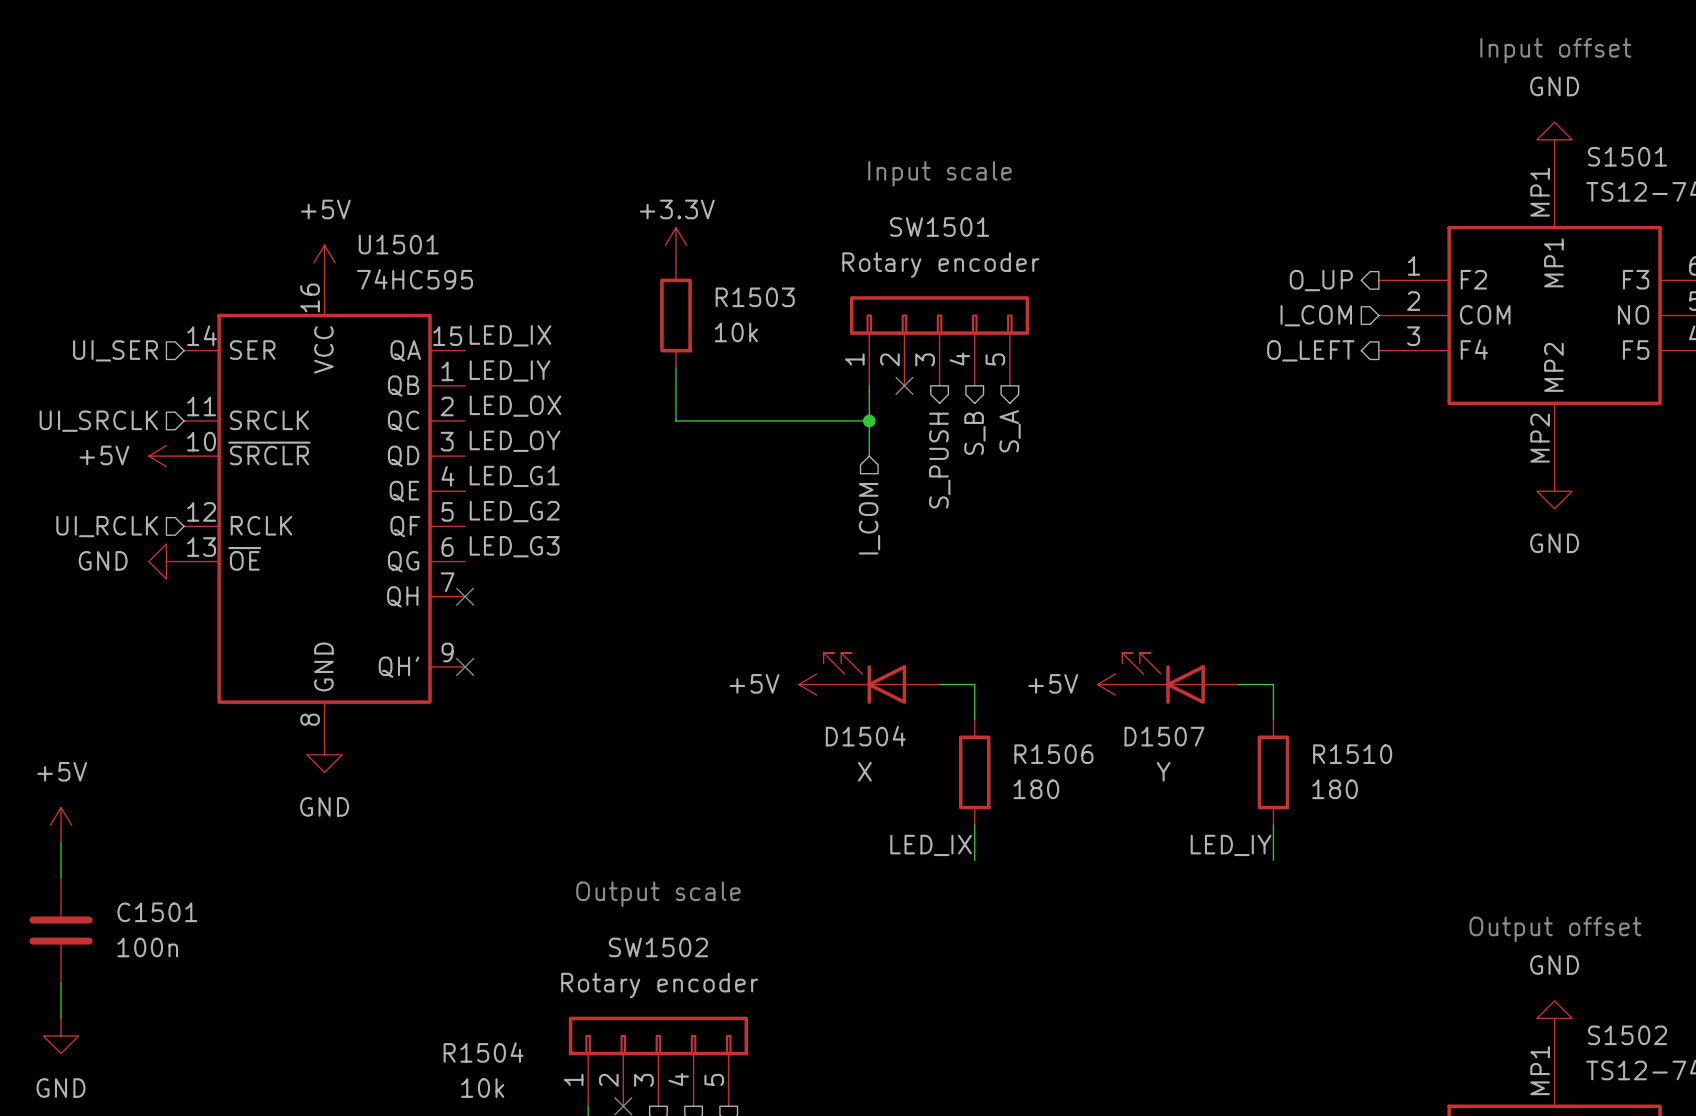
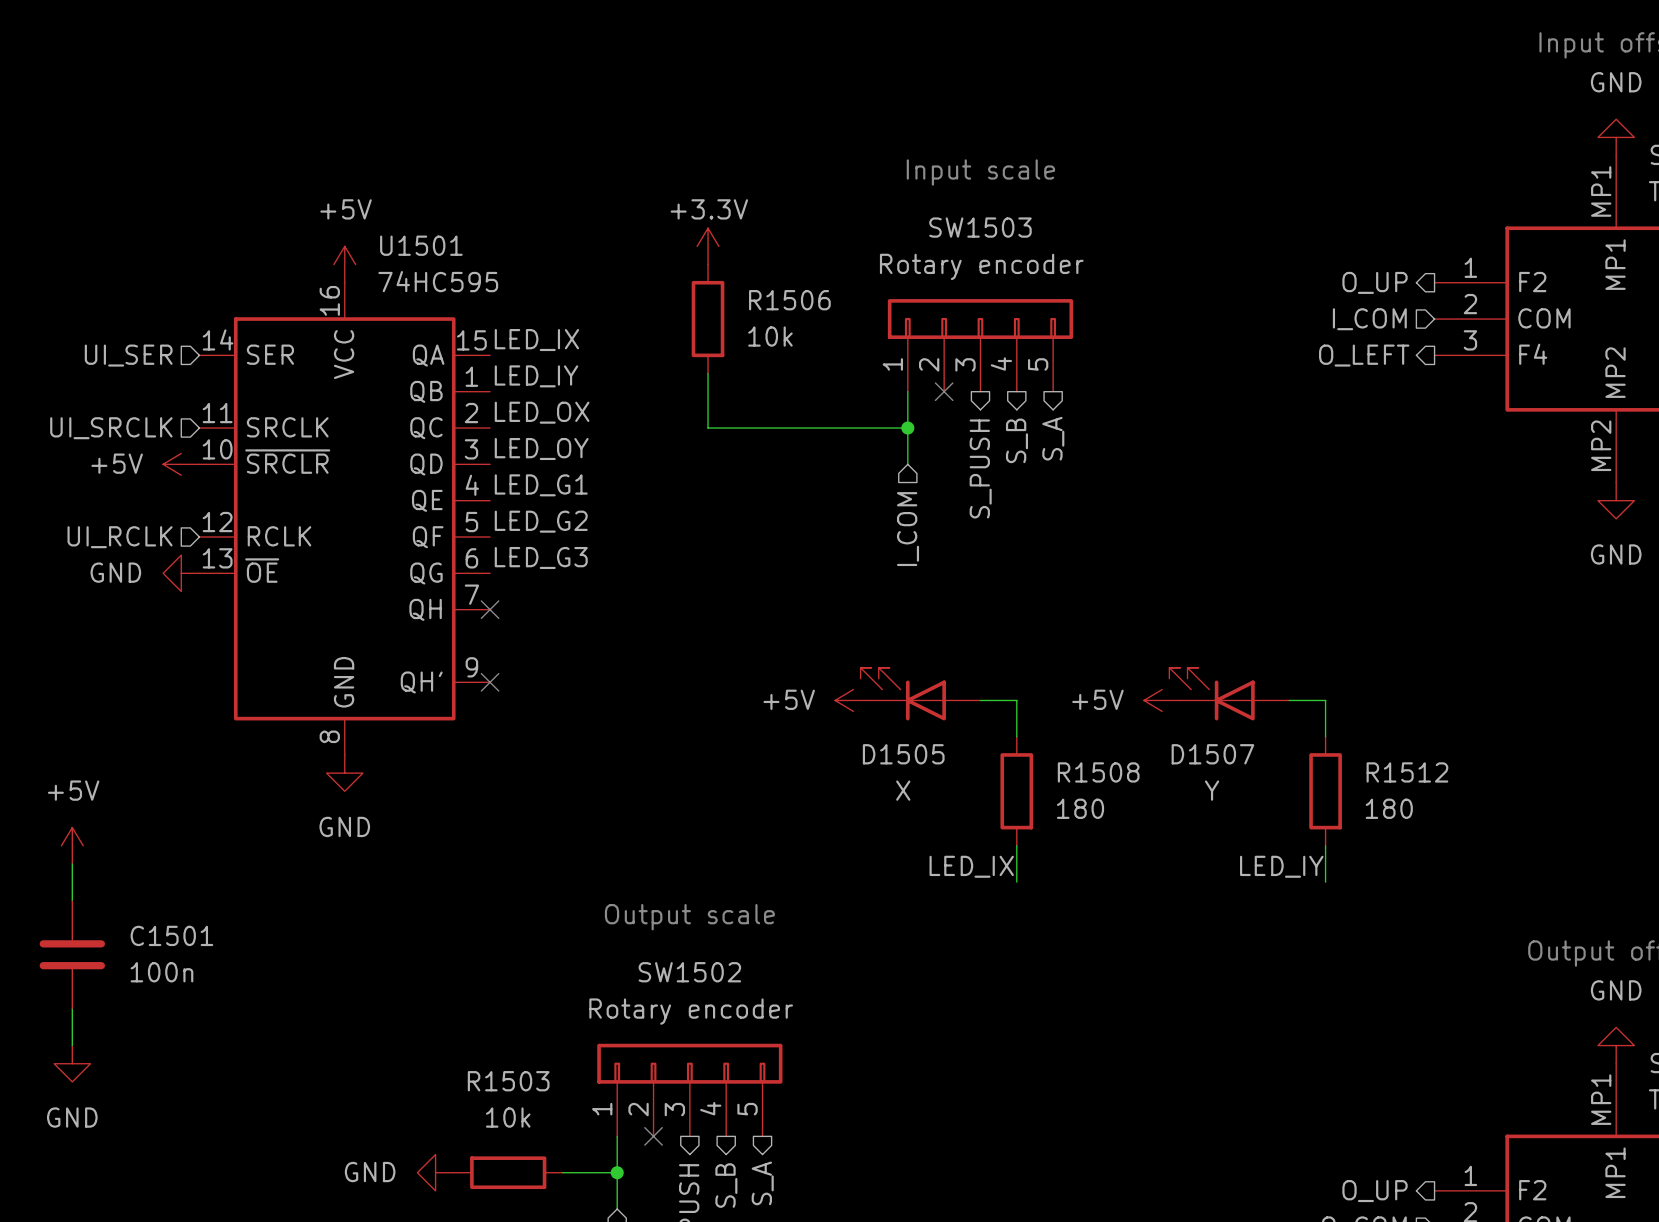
SW1501 name: SW1501 (939, 227) -> SW1503 (980, 227)
R1503 name: R1503 (755, 297) -> R1506 (789, 300)
D1504 name: D1504 (865, 736) -> D1505 (903, 754)
R1506 name: R1506 (1053, 754) -> R1508 (1098, 772)
R1510 name: R1510 (1352, 754) -> R1512 (1407, 772)
R1504 name: R1504 (483, 1052) -> R1503 (508, 1081)

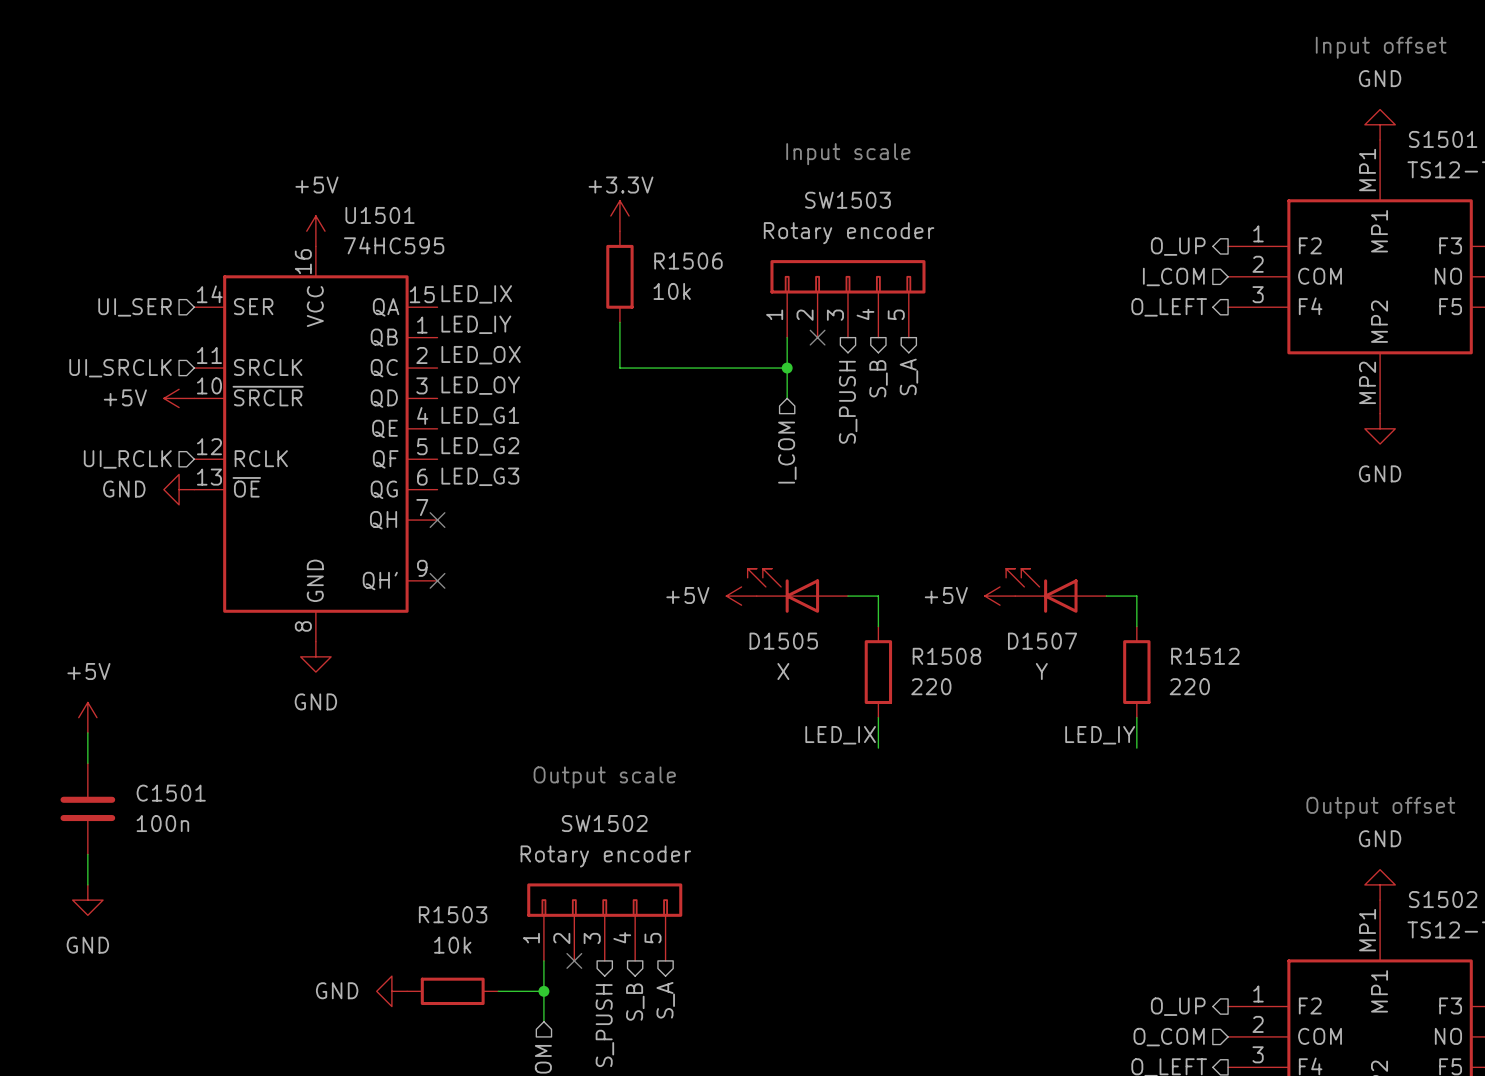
R1508 value: 180 (1080, 808) -> 220 (931, 686)
R1512 value: 180 (1389, 808) -> 220 (1189, 686)

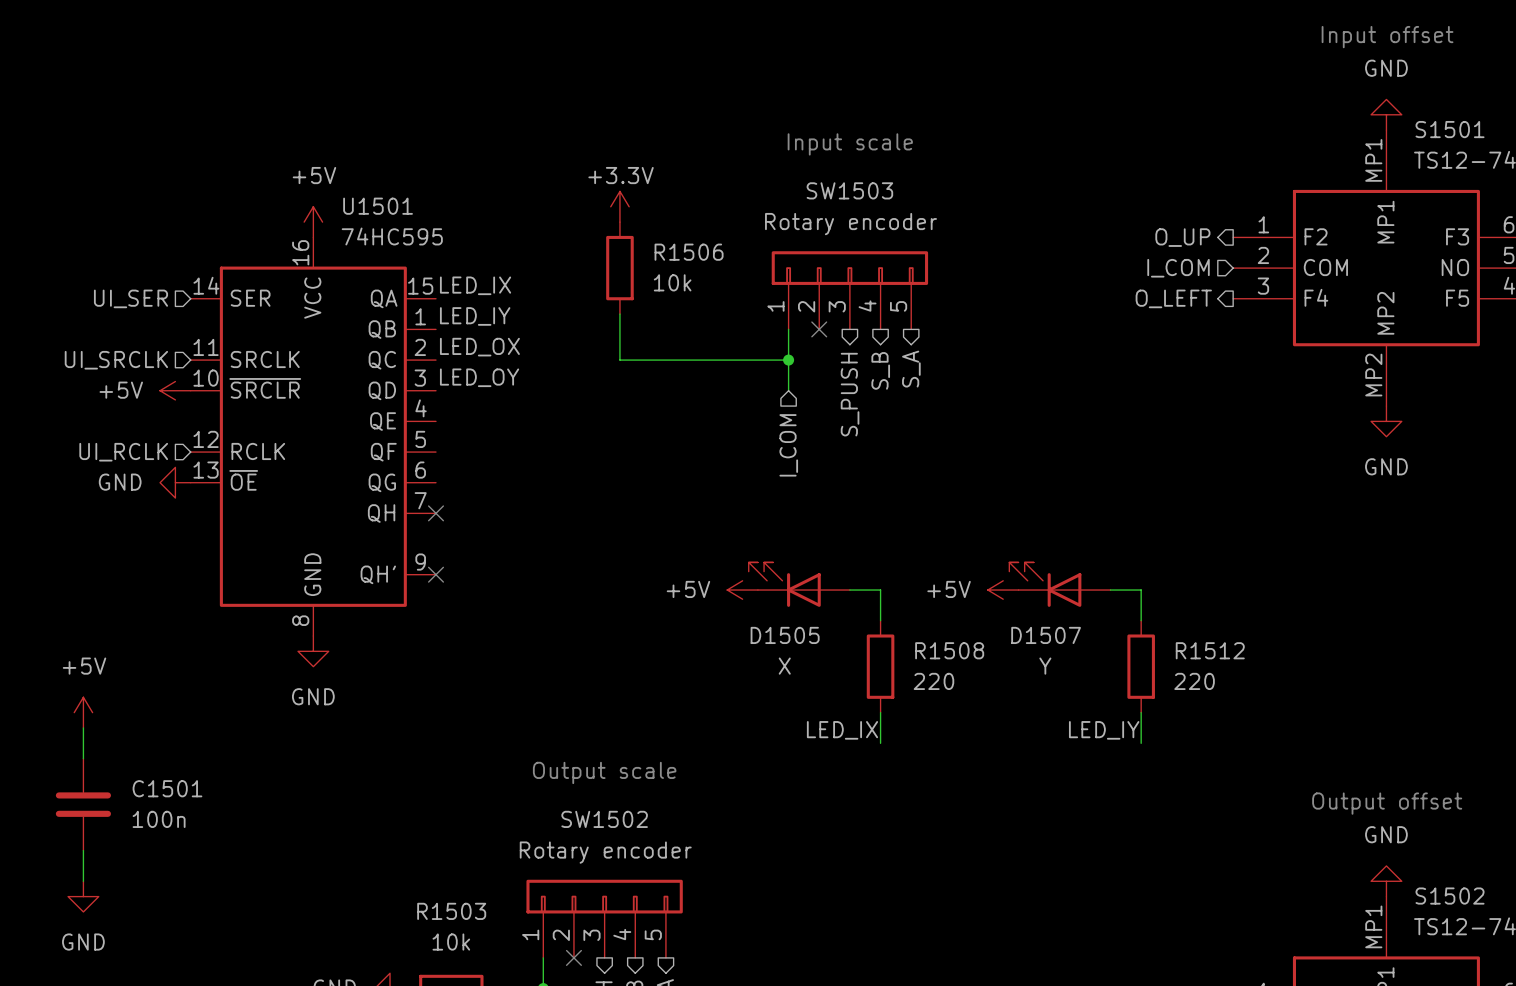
label: LED_G1 (480, 415) -> none
label: LED_G2 (480, 446) -> none
label: LED_G3 (480, 476) -> none

